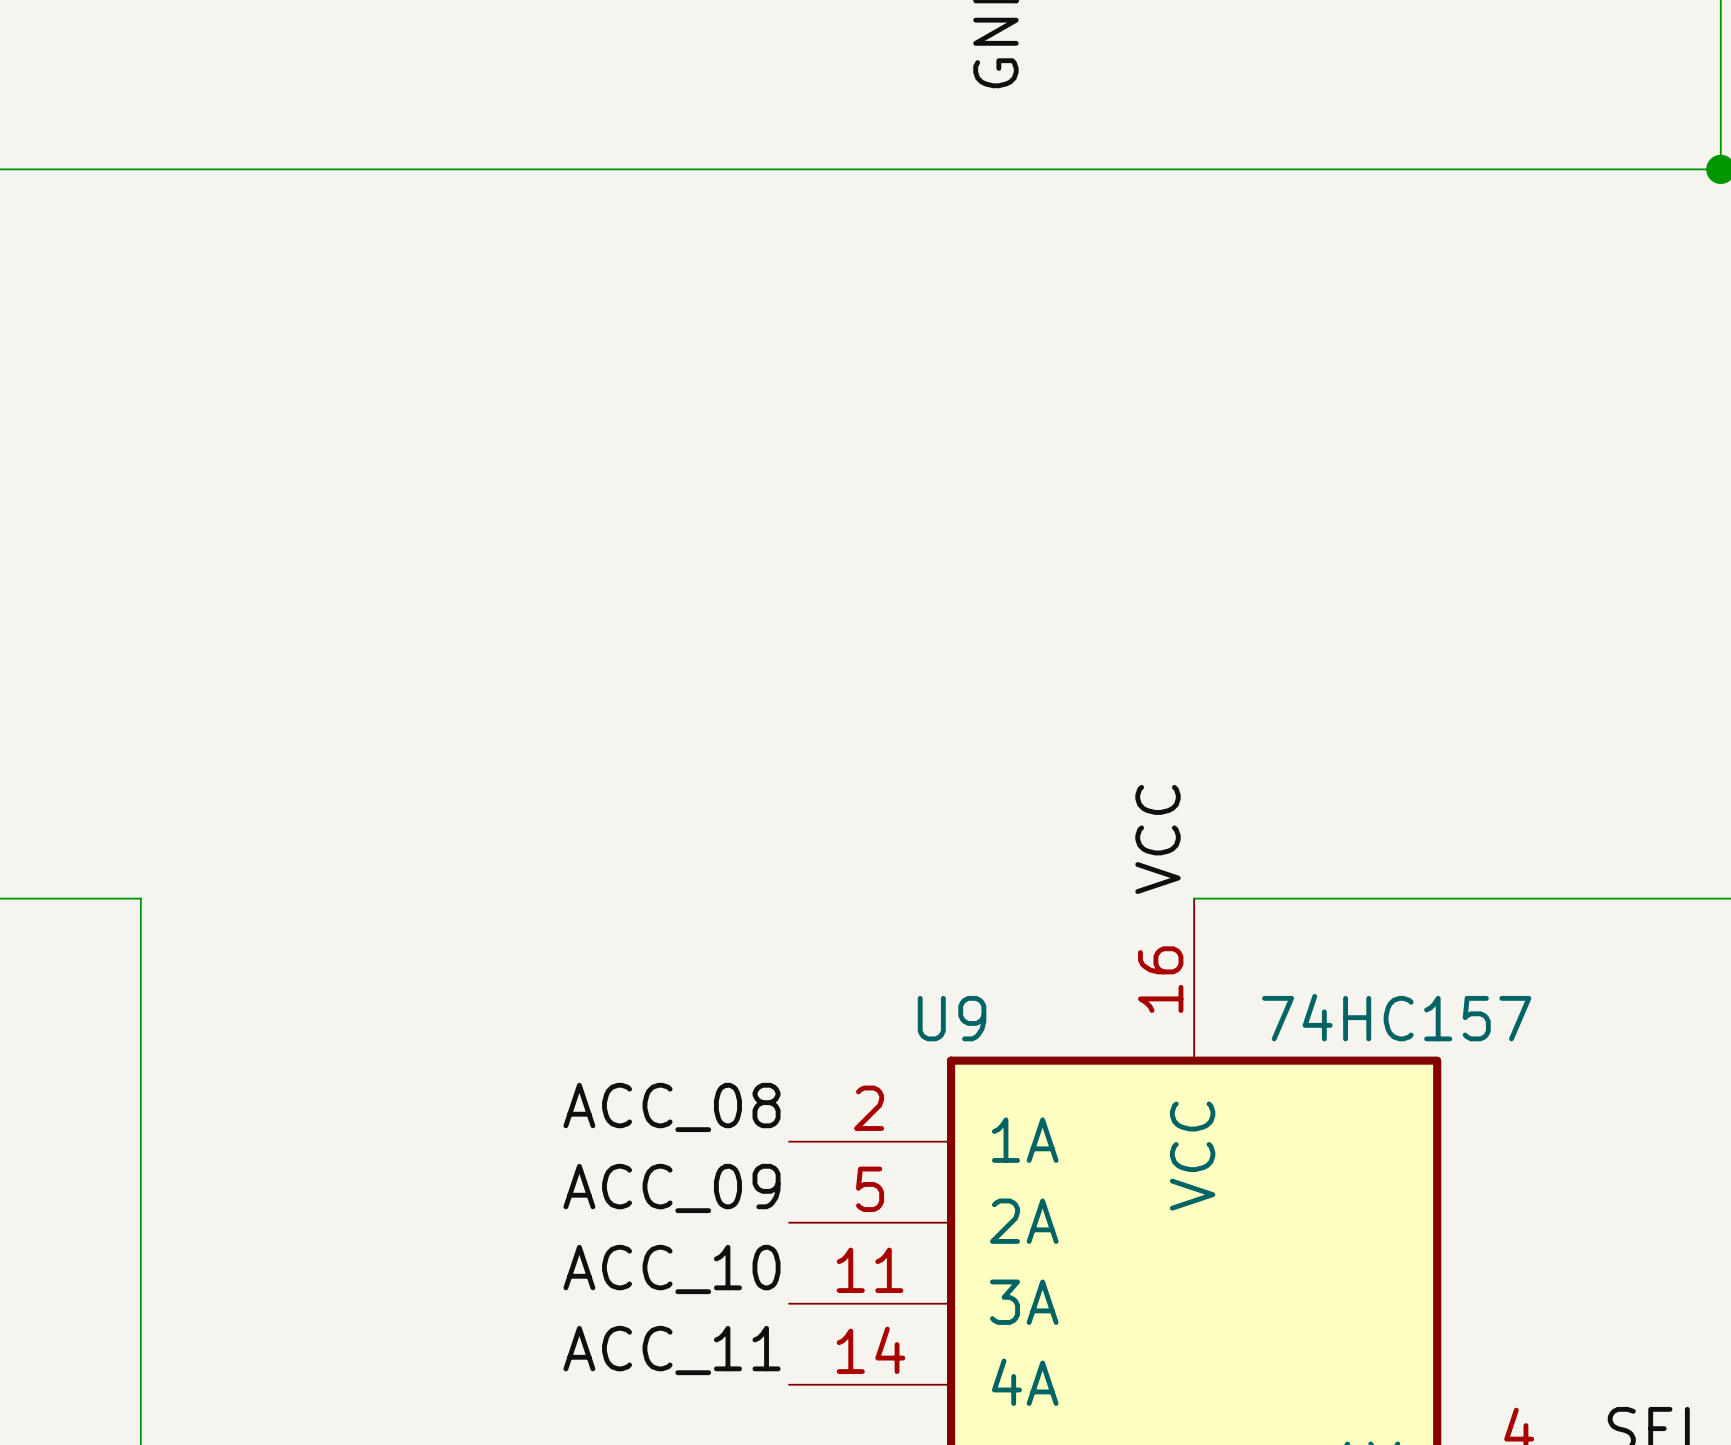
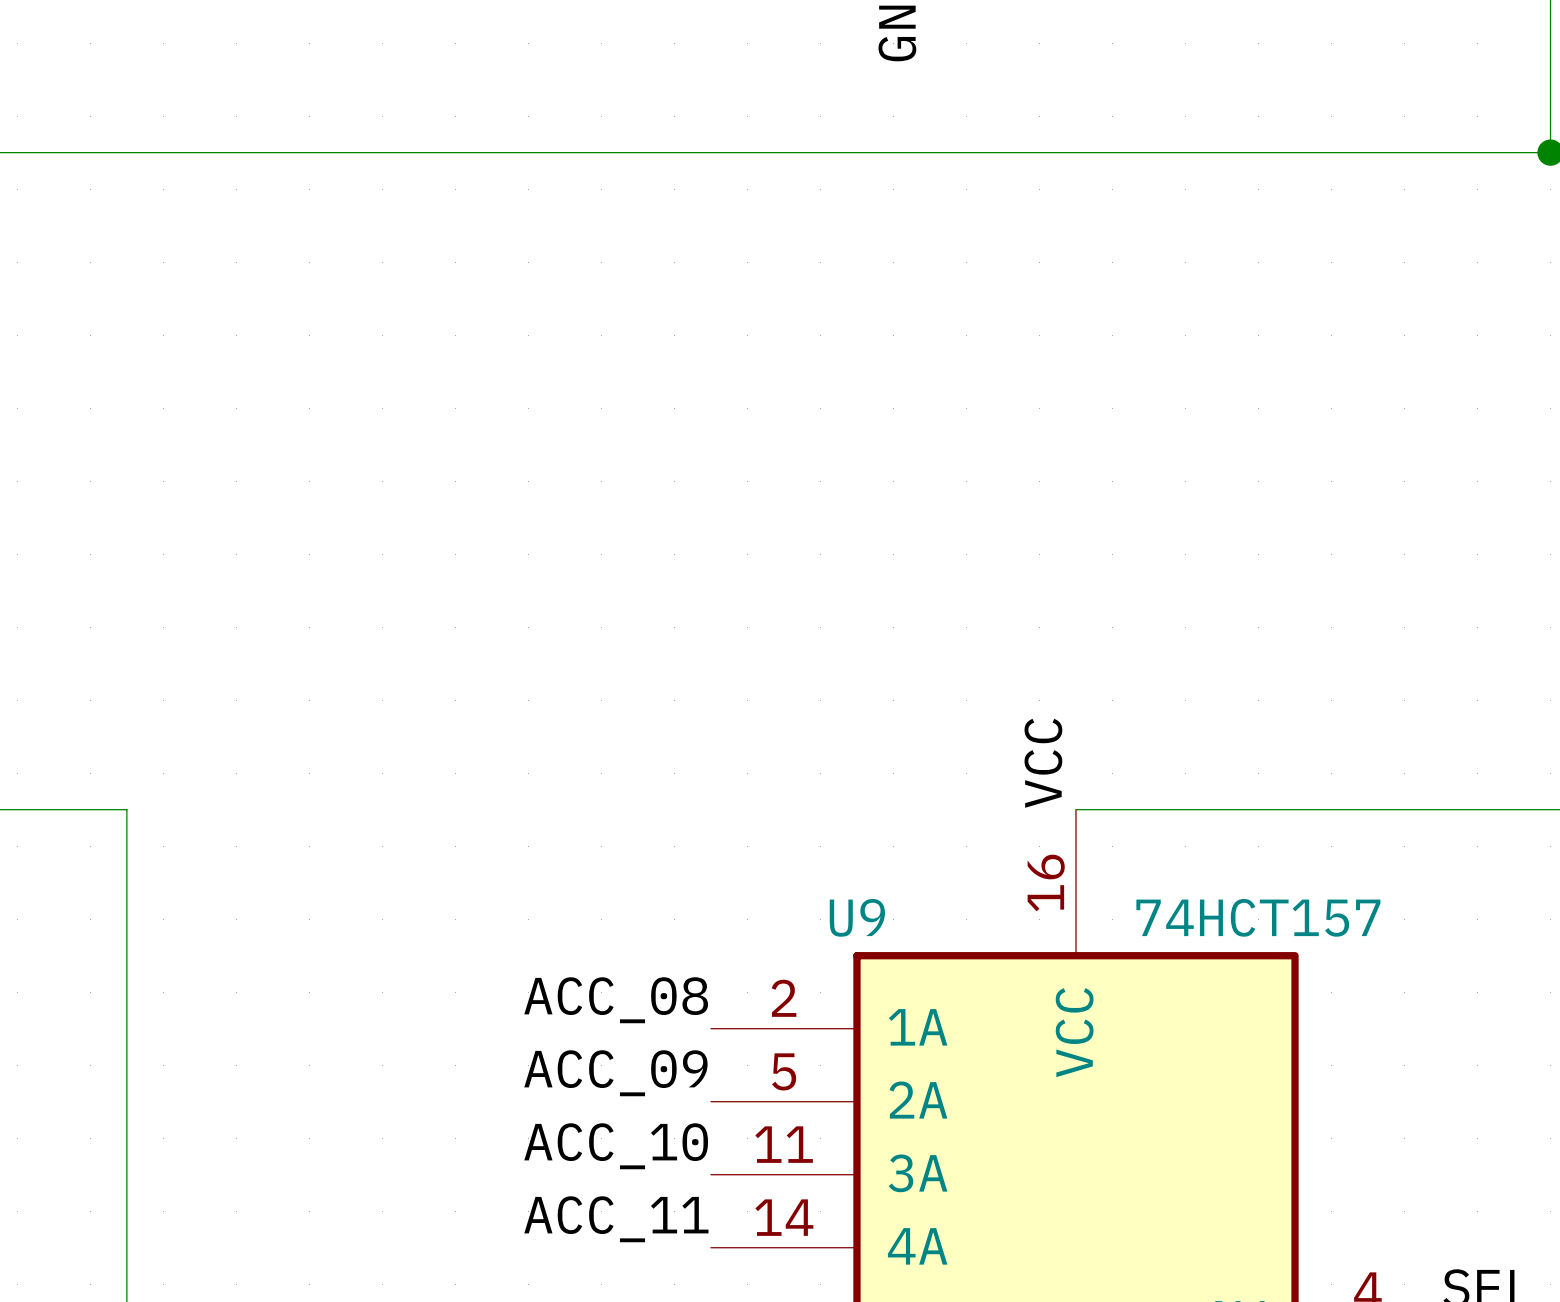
U9 value: 74HC157 (1396, 1017) -> 74HCT157 (1258, 917)

